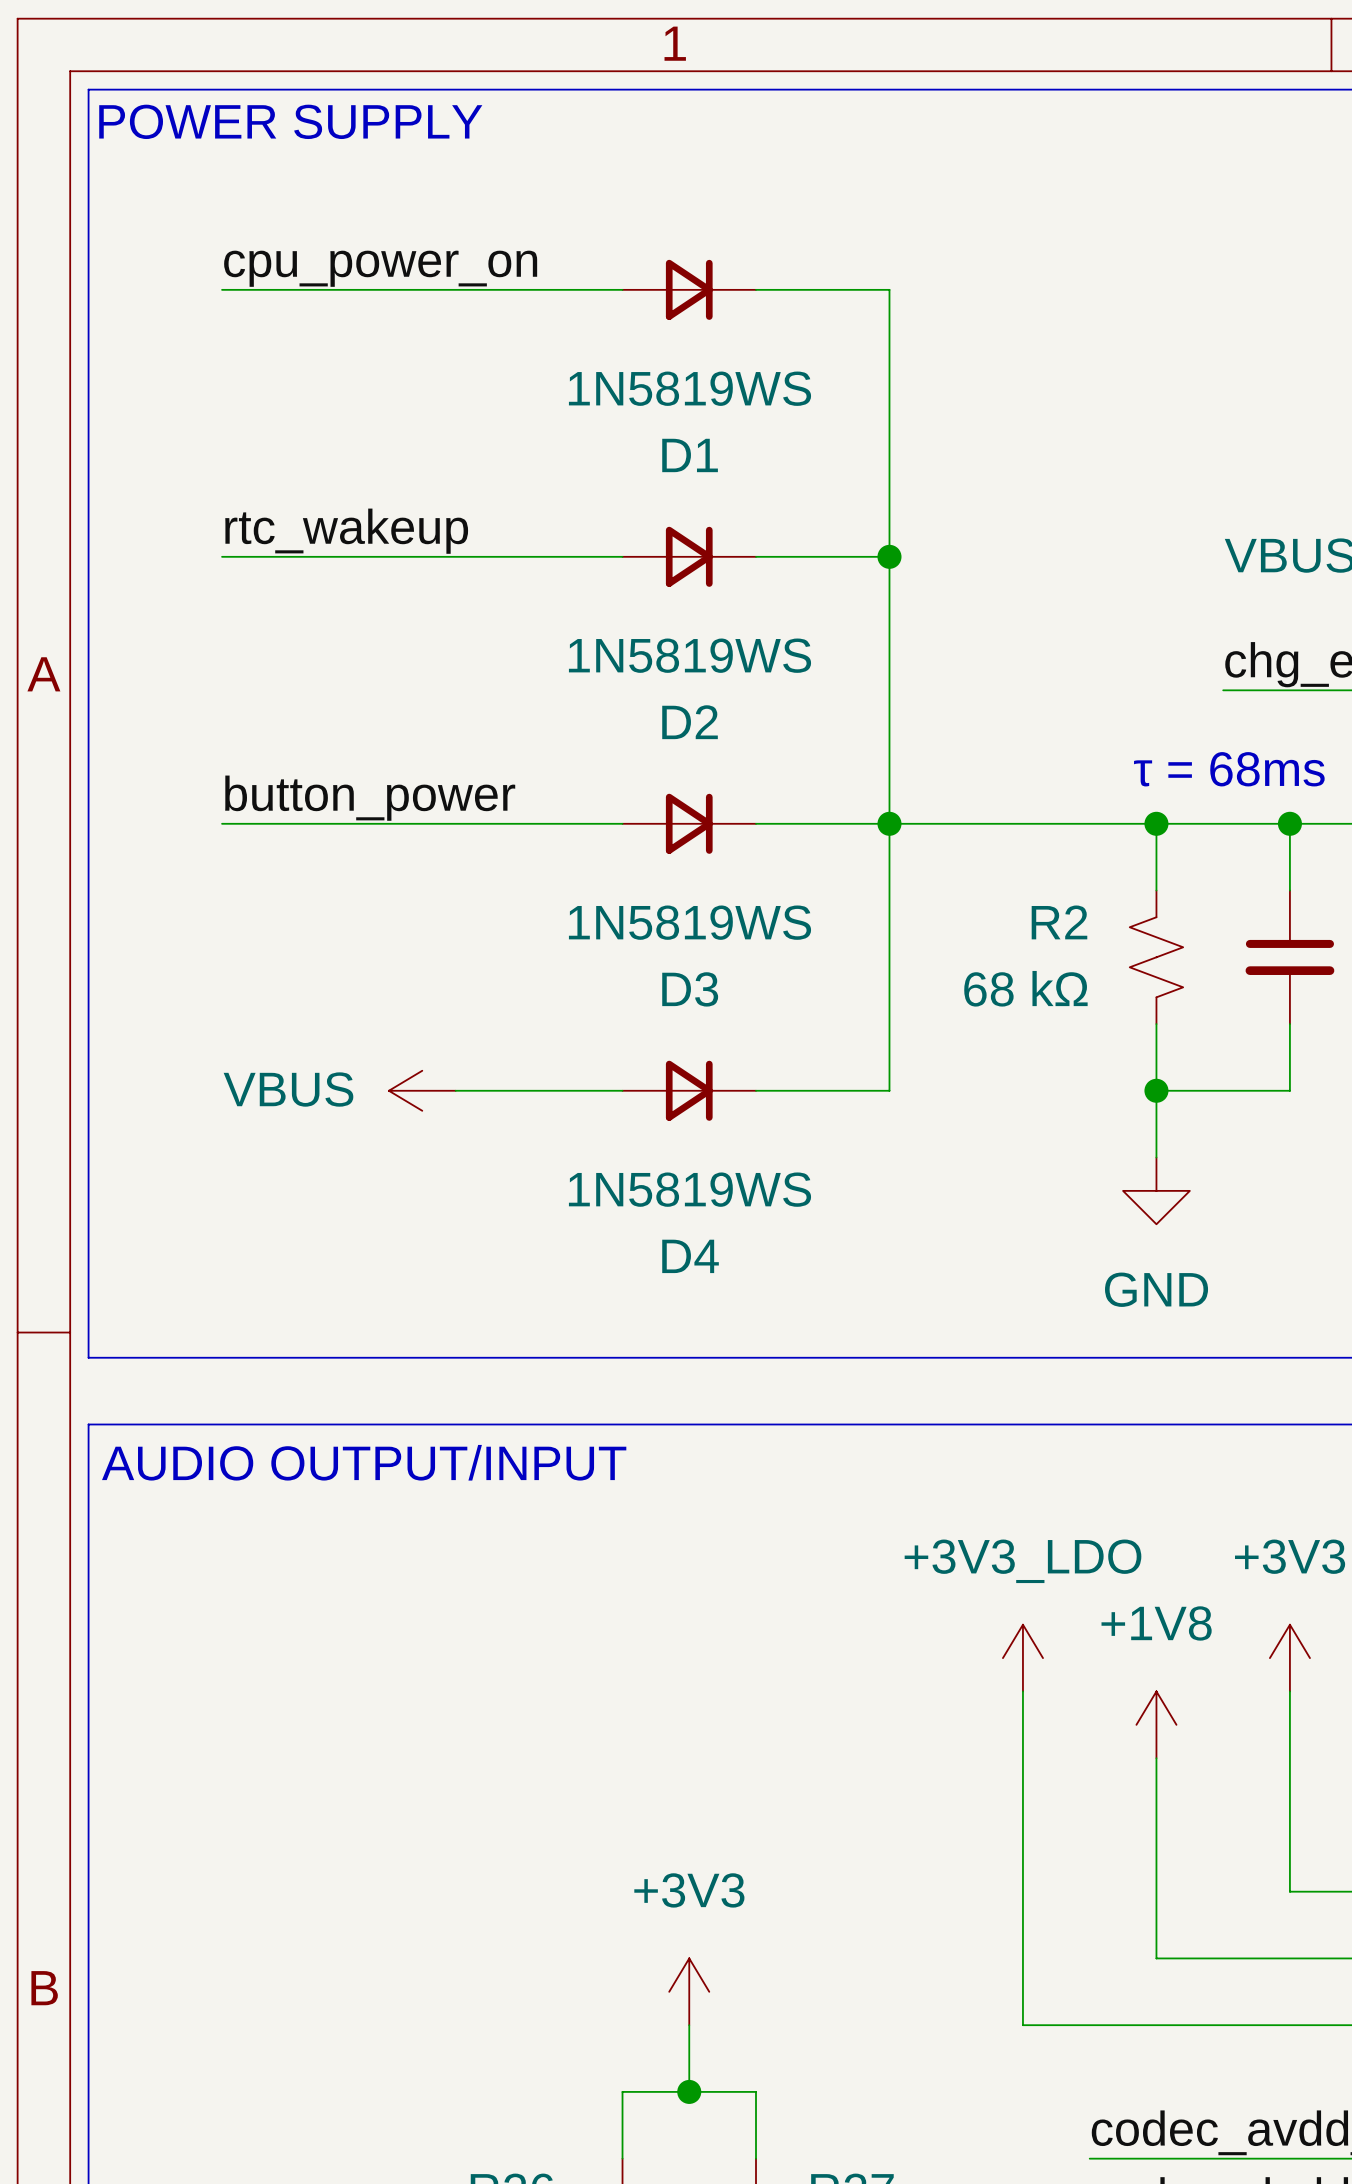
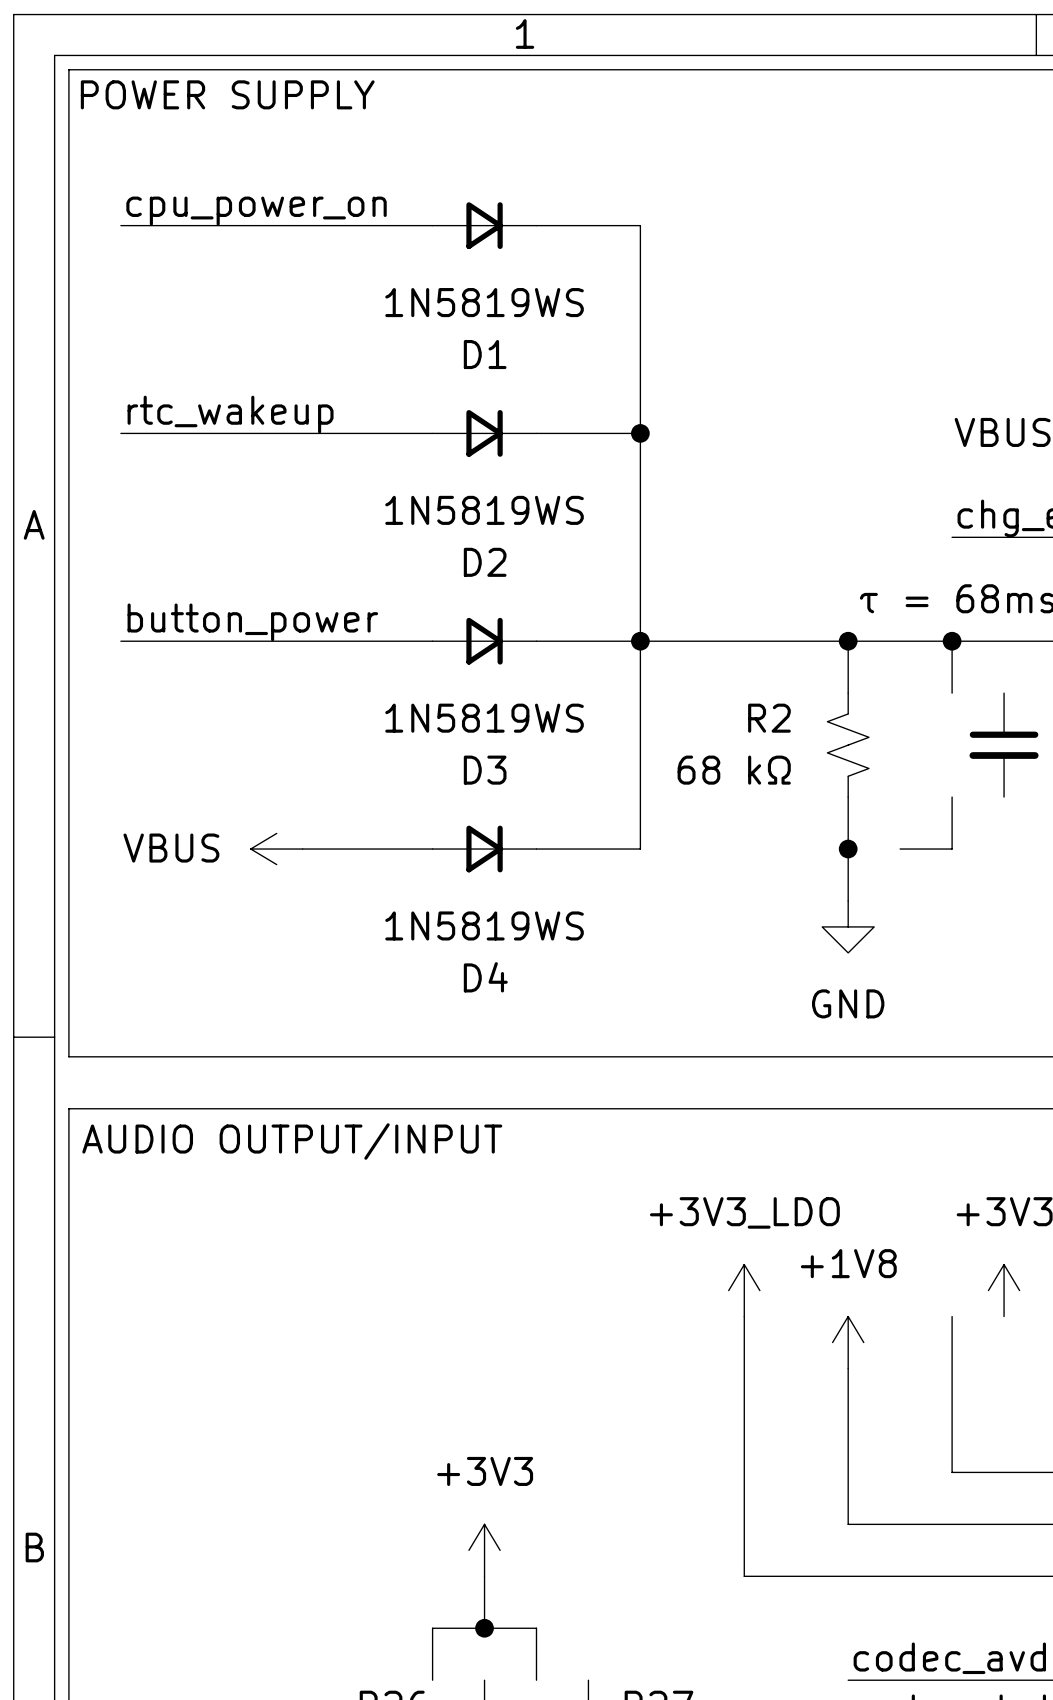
label position: cpu_power_on (380, 268) -> cpu_power_on (256, 211)
wire: none -> (120, 225) (172, 225)
D1 position: (689, 289) -> (484, 225)
wire: (822, 289) (889, 289) (889, 1090) (822, 1090) -> (640, 225) (640, 849)
label position: rtc_wakeup (346, 531) -> rtc_wakeup (230, 414)
wire: none -> (120, 433) (172, 433)
D2 position: (689, 556) -> (484, 433)
wire: (822, 556) (889, 556) -> none
junction position: (889, 556) -> (640, 433)
label position: button_power (370, 798) -> button_power (252, 622)
wire: none -> (120, 641) (172, 641)
D3 position: (689, 823) -> (484, 641)
junction position: (889, 823) -> (640, 641)
junction: none -> (848, 641)
wire: (1156, 823) (1156, 890) -> (848, 641) (848, 693)
junction: (1156, 823) -> none
junction: none -> (952, 641)
wire: (1289, 823) (1289, 890) -> (952, 641) (952, 693)
junction: (1289, 823) -> none
R2 position: (1156, 957) -> (848, 745)
wire: (1156, 1024) (1156, 1157) -> (848, 797) (848, 900)
wire: (1289, 1024) (1289, 1090) (1223, 1090) -> (952, 797) (952, 849)
power symbol position: VBUS (422, 1090) -> VBUS (276, 849)
D4 position: (689, 1090) -> (484, 849)
junction position: (1156, 1090) -> (848, 849)
power symbol position: GND (1156, 1190) -> GND (848, 926)
power symbol position: +3V3_LDO (1022, 1658) -> +3V3_LDO (744, 1290)
wire: (1022, 1691) (1022, 2025) -> (744, 1316) (744, 1576) (796, 1576)
wire: (1289, 1691) (1289, 1891) -> (952, 1316) (952, 1472) (1004, 1472)
power symbol position: +1V8 (1156, 1724) -> +1V8 (848, 1342)
wire: (1156, 1758) (1156, 1958) -> (848, 1368) (848, 1524) (900, 1524)
power symbol position: +3V3 (689, 1991) -> +3V3 (484, 1550)
wire: none -> (484, 1576) (484, 1628) (432, 1628) (432, 1680)
wire: (689, 2025) (689, 2091) (756, 2091) (756, 2158) -> none
wire: (622, 2091) (622, 2158) -> (536, 1628) (536, 1680)
junction position: (689, 2091) -> (484, 1628)

